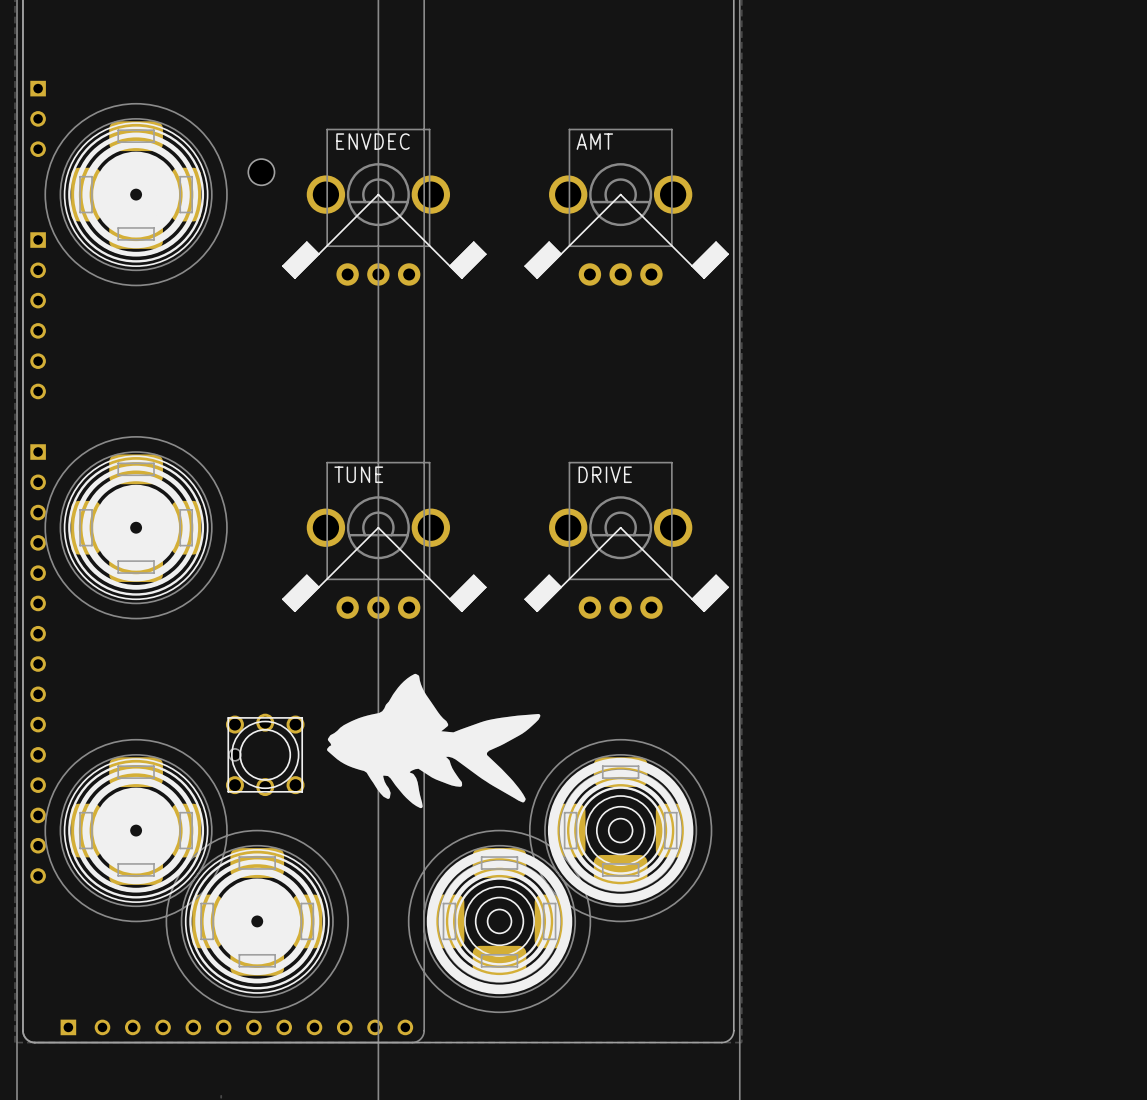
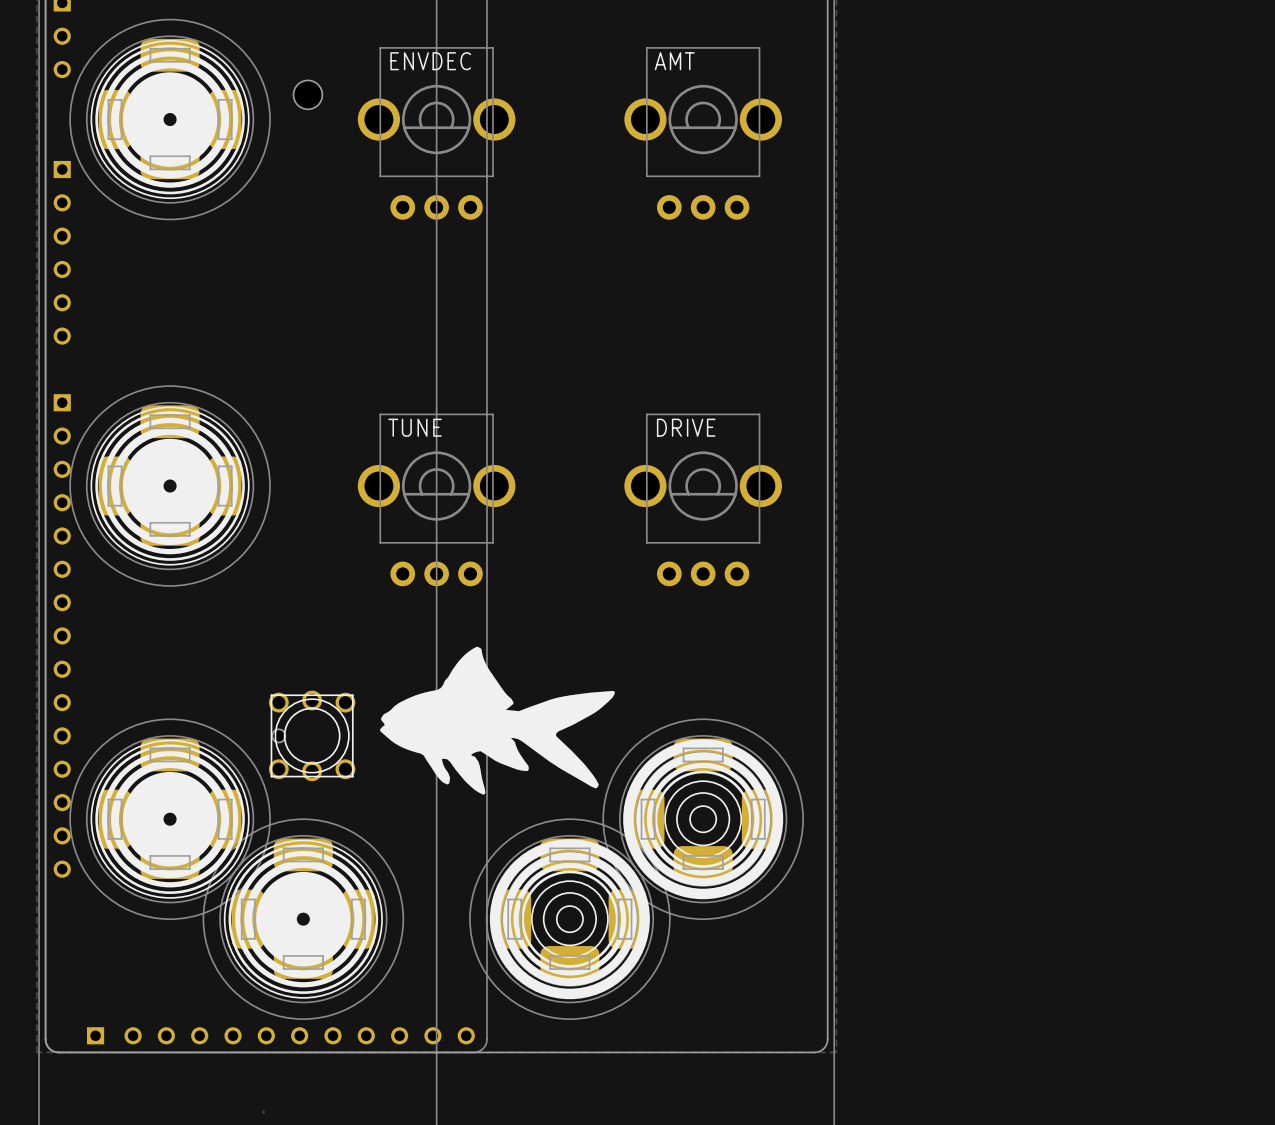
ENVDEC footprint: [282, 128, 487, 286] -> [357, 47, 516, 220]
AMT footprint: [524, 128, 729, 286] -> [624, 47, 782, 220]
TUNE footprint: [282, 461, 487, 619] -> [357, 413, 516, 587]
DRIVE footprint: [524, 461, 729, 619] -> [624, 413, 782, 587]

